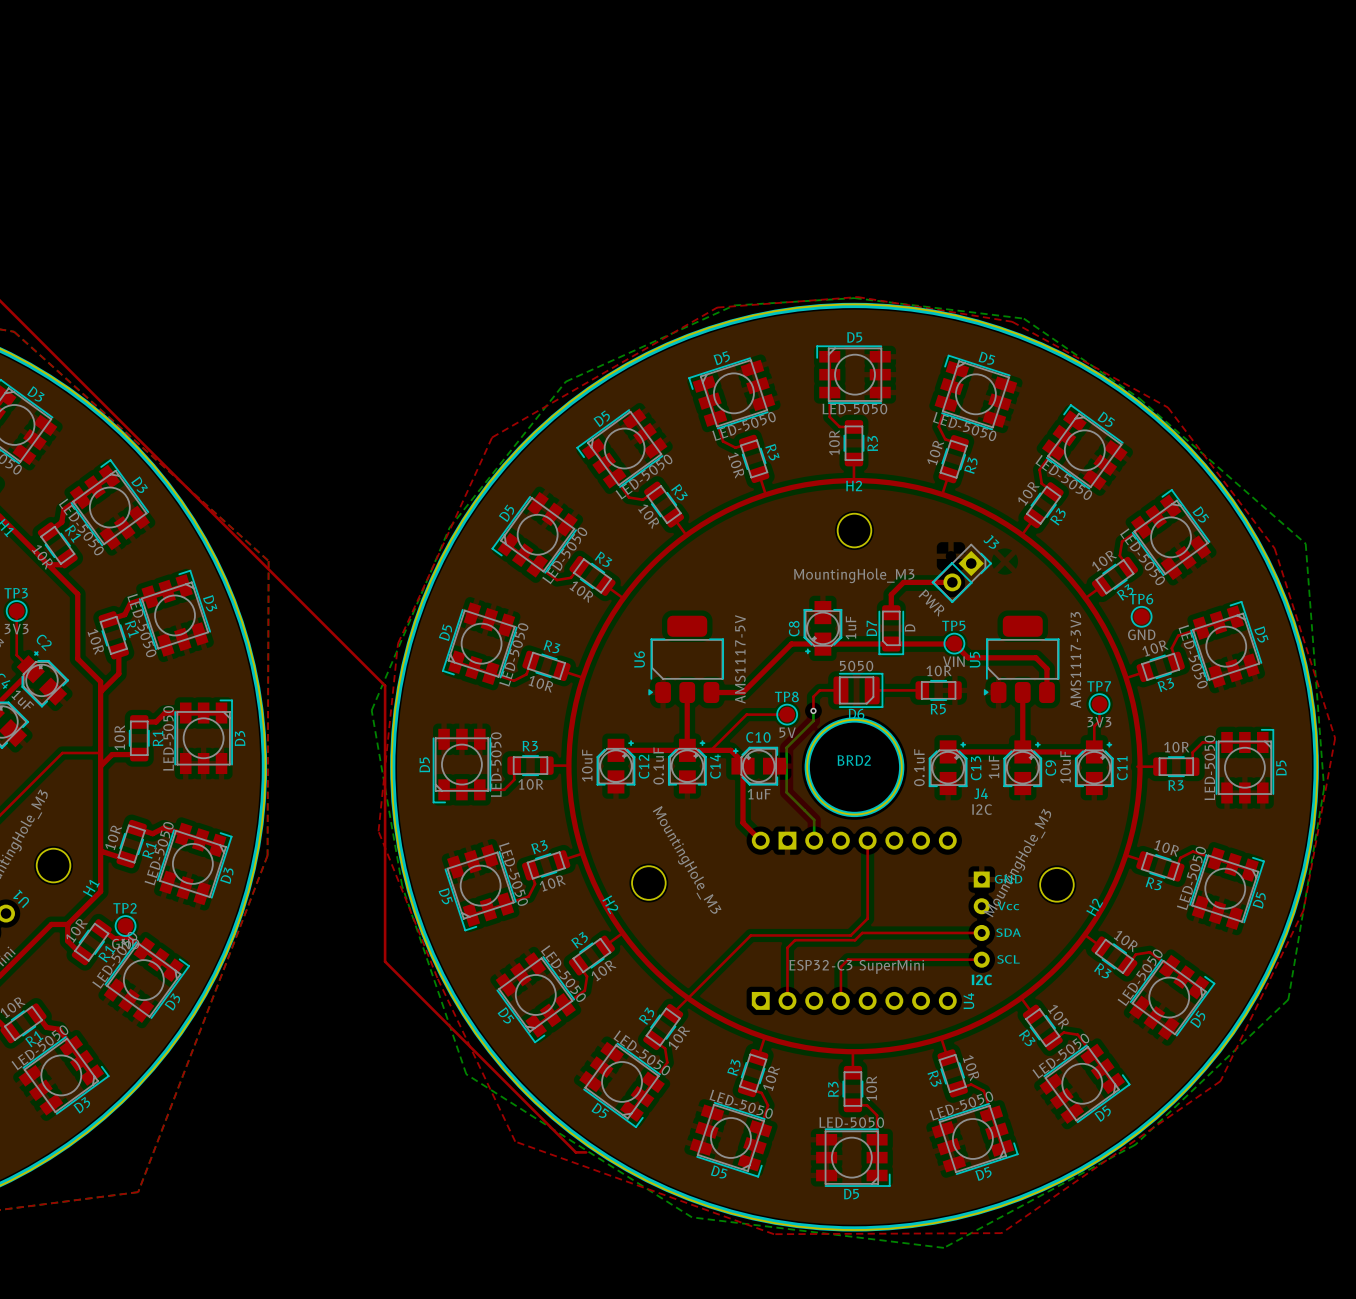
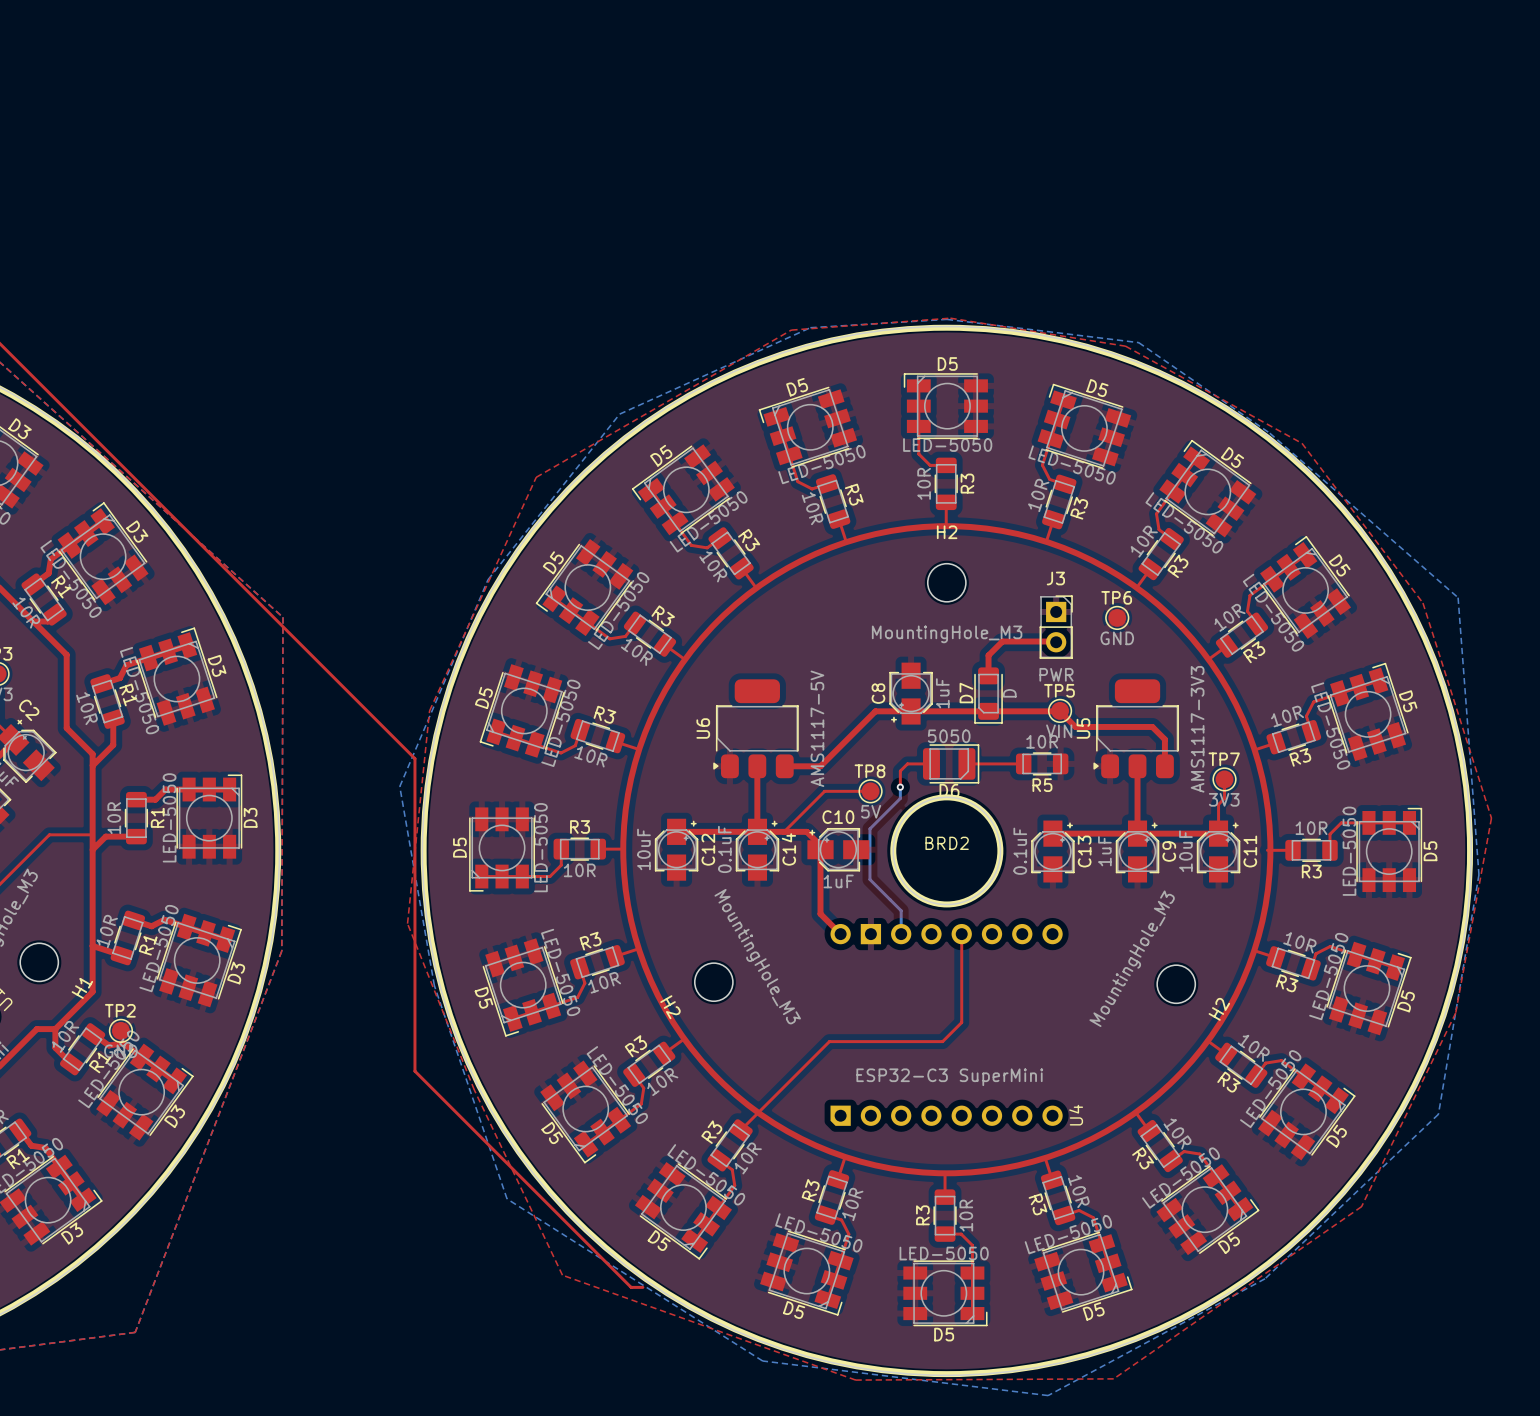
J3 rotation: 0° (961, 573) -> 45° counterclockwise (1056, 627)
TP6 position: (1141, 616) -> (1117, 617)
J4: I2C (981, 919) -> none
top track: (981, 932) (862, 932) (855, 940) (795, 940) (787, 947) (787, 1000) -> none
top track: (981, 959) (848, 959) (840, 966) (840, 1000) -> none

